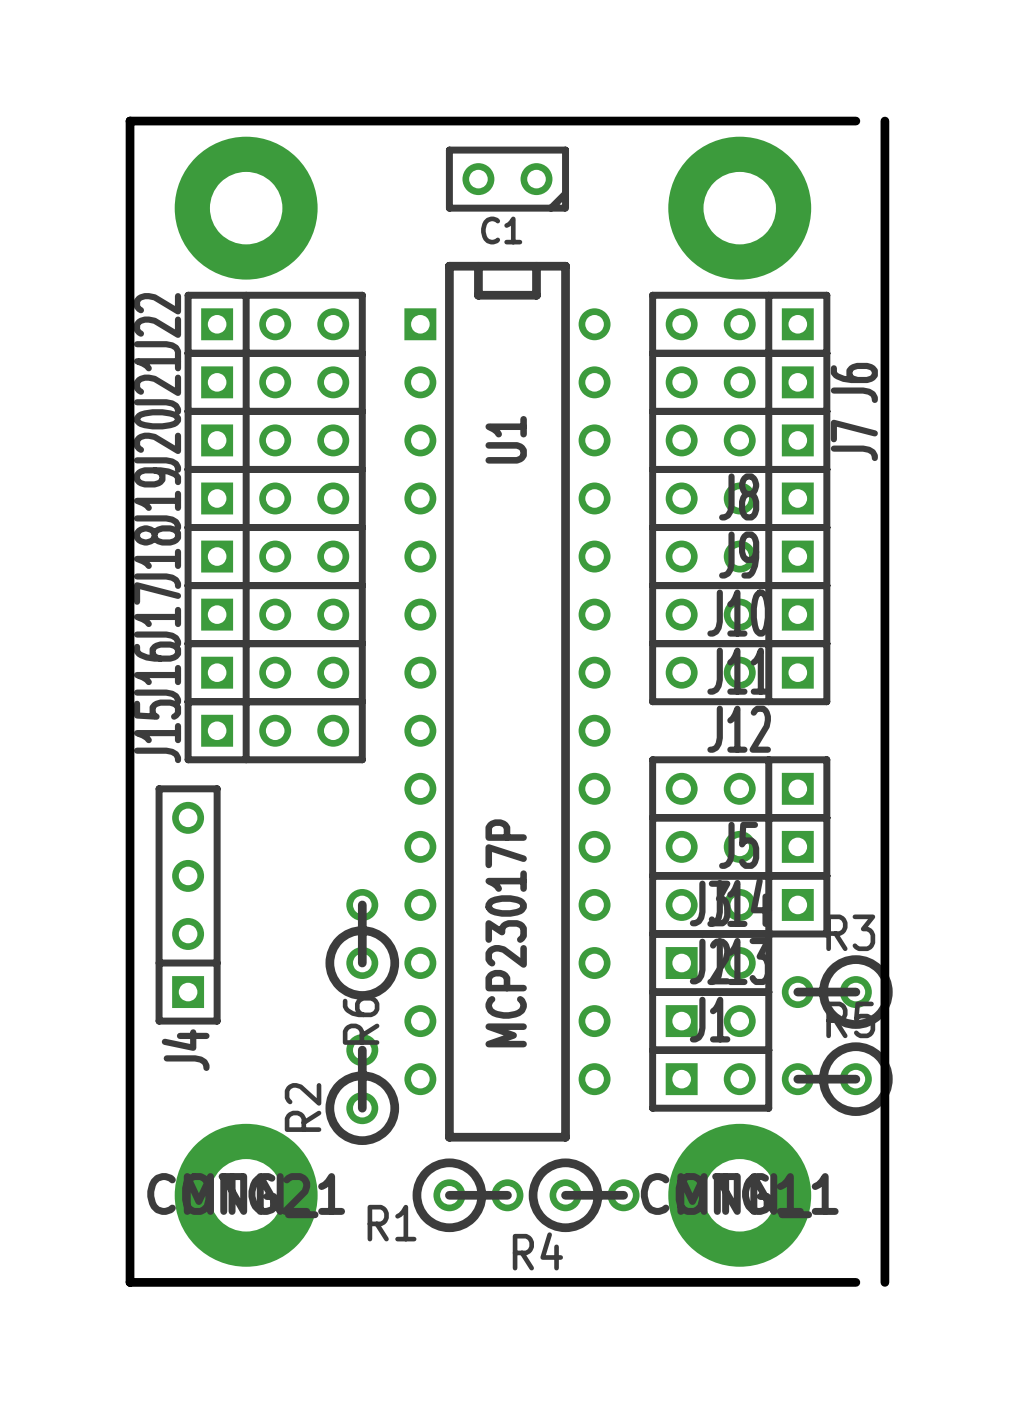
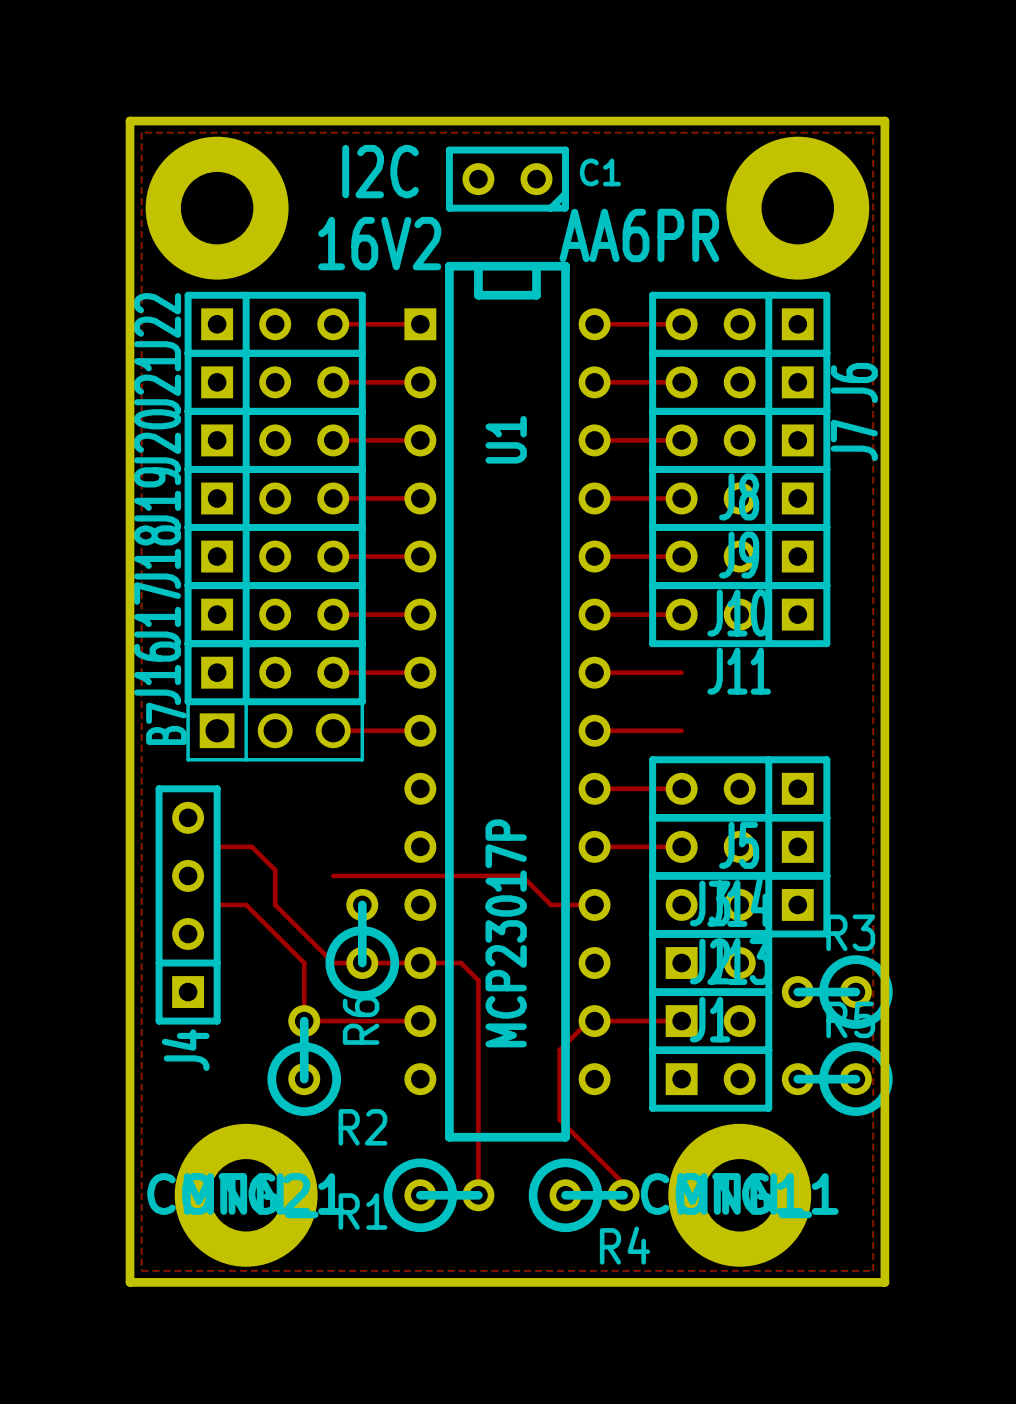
board edge: none -> (855, 121) (884, 121)
top zone outline: none -> (141, 132) (873, 132) (873, 1270) (141, 1270) (141, 132)
text: none -> I2C (380, 171)
part position: (246, 208) -> (217, 208)
part position: (739, 208) -> (797, 208)
C1 name position: C1 (501, 230) -> C1 (600, 172)
text: none -> AA6PR (639, 235)
text: none -> 16V2 (379, 243)
top track: none -> (333, 324) (420, 324)
top track: none -> (594, 324) (681, 324)
top track: none -> (333, 382) (420, 382)
top track: none -> (594, 382) (681, 382)
top track: none -> (333, 440) (420, 440)
top track: none -> (594, 440) (681, 440)
top track: none -> (333, 498) (420, 498)
top track: none -> (594, 498) (681, 498)
top track: none -> (333, 556) (420, 556)
top track: none -> (594, 556) (681, 556)
top track: none -> (333, 614) (420, 614)
top track: none -> (594, 614) (681, 614)
top track: none -> (333, 672) (420, 672)
top track: none -> (594, 672) (681, 672)
J12: (739, 672) -> none
text: none -> B7 (166, 723)
J15: (275, 730) -> none
part: none -> (275, 730)
top track: none -> (333, 730) (420, 730)
top track: none -> (594, 730) (681, 730)
top track: none -> (594, 788) (681, 788)
top track: none -> (217, 846) (251, 846) (275, 870) (275, 904) (333, 963) (461, 963) (478, 980) (478, 1195)
top track: none -> (594, 846) (681, 846)
top track: none -> (333, 875) (521, 875) (551, 904) (594, 904)
top track: none -> (217, 904) (246, 904) (304, 963) (304, 1021) (420, 1021)
top track: none -> (681, 1021) (588, 1021) (559, 1050) (559, 1119) (623, 1183) (623, 1195)
R2 position: (362, 1089) -> (304, 1060)
R2 name rotation: 0° (303, 1107) -> 90° clockwise (362, 1127)
R1 position: (468, 1195) -> (438, 1195)
R1 name position: R1 (392, 1223) -> R1 (362, 1211)
R4 name position: R4 (537, 1251) -> R4 (624, 1245)
board edge: none -> (855, 1282) (884, 1282)

